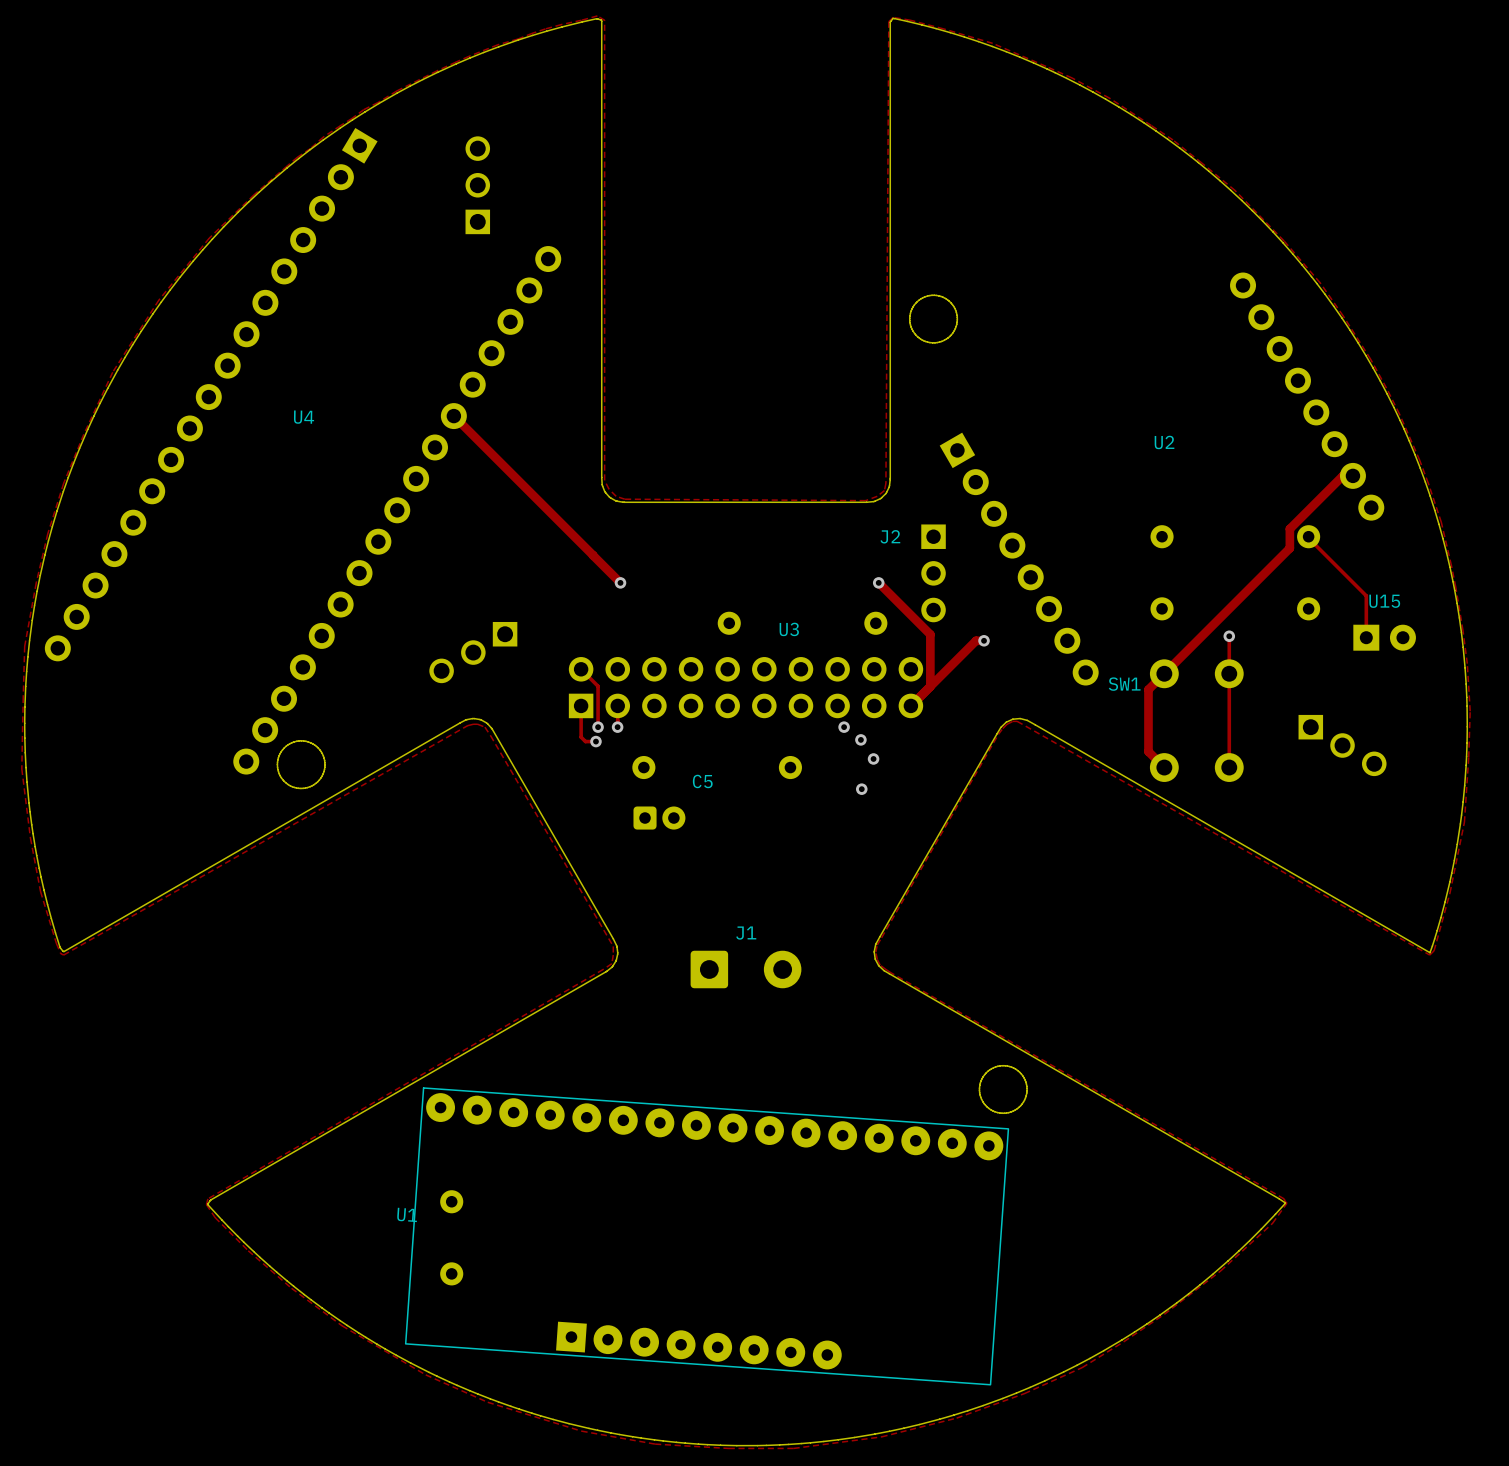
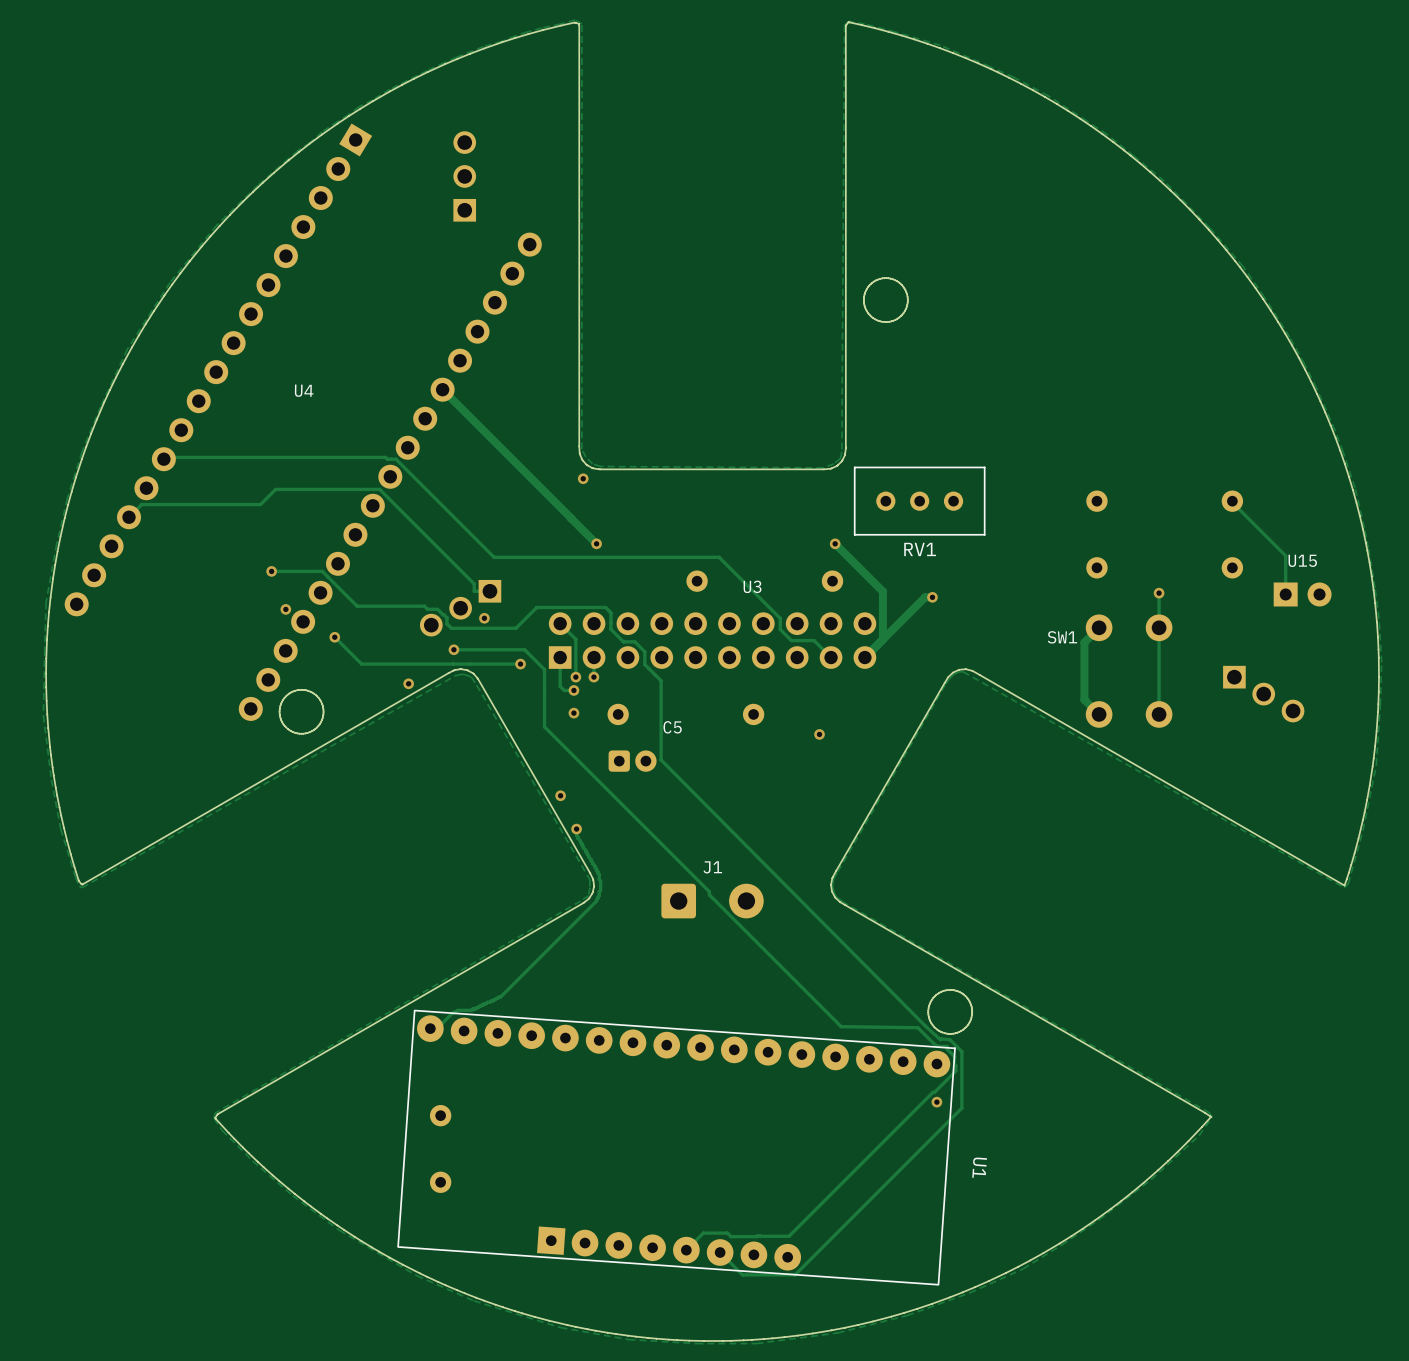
track: (1352, 475) (1342, 475) (1289, 528) (1289, 548) (1164, 673) -> none
U2: (1161, 479) -> none
track: none -> (163, 459) (165, 457) (385, 457) (395, 459) (494, 557) (719, 557) (780, 618) (780, 629) (791, 640) (814, 640) (831, 657)
via: none -> (583, 478)
RV1: none -> (919, 501)
track: none -> (129, 517) (141, 504) (260, 504) (275, 489) (379, 489) (474, 583) (474, 591) (489, 591)
J2: (933, 573) -> none
track: none -> (271, 571) (322, 571) (357, 606) (424, 606) (427, 609) (437, 609) (446, 617) (446, 623) (451, 628) (515, 628) (536, 607) (605, 607) (610, 612) (610, 629) (623, 641) (634, 641) (644, 651) (644, 664) (661, 680) (661, 759) (925, 1026) (940, 1039) (949, 1039) (961, 1051) (961, 1108) (795, 1274) (742, 1274) (720, 1252)
via: none -> (271, 571)
via: none -> (285, 609)
via: none -> (484, 618)
track: none -> (334, 637) (361, 664) (520, 664)
via: none -> (334, 637)
track: none -> (453, 649) (524, 649) (544, 669) (544, 726) (841, 1026) (917, 1027) (937, 1046) (947, 1046) (947, 1049) (954, 1056) (955, 1071) (789, 1236) (760, 1236)
via: none -> (453, 649)
via: none -> (520, 664)
via: (844, 727) -> none
via: none -> (408, 683)
via: (860, 739) -> none
via: (873, 758) -> none
via: none -> (573, 713)
via: none -> (560, 795)
track: none -> (576, 829) (576, 835) (599, 874) (600, 890) (596, 901) (500, 997) (471, 1010) (457, 1010) (441, 1023) (430, 1028)
via: none -> (576, 829)
via: none -> (936, 1102)
U1 name rotation: 0° (407, 1214) -> 90° clockwise (979, 1167)
U1 name position: U1 (407, 1214) -> U1 (979, 1167)
track: none -> (760, 1236) (731, 1236) (727, 1233) (703, 1233) (686, 1250)

